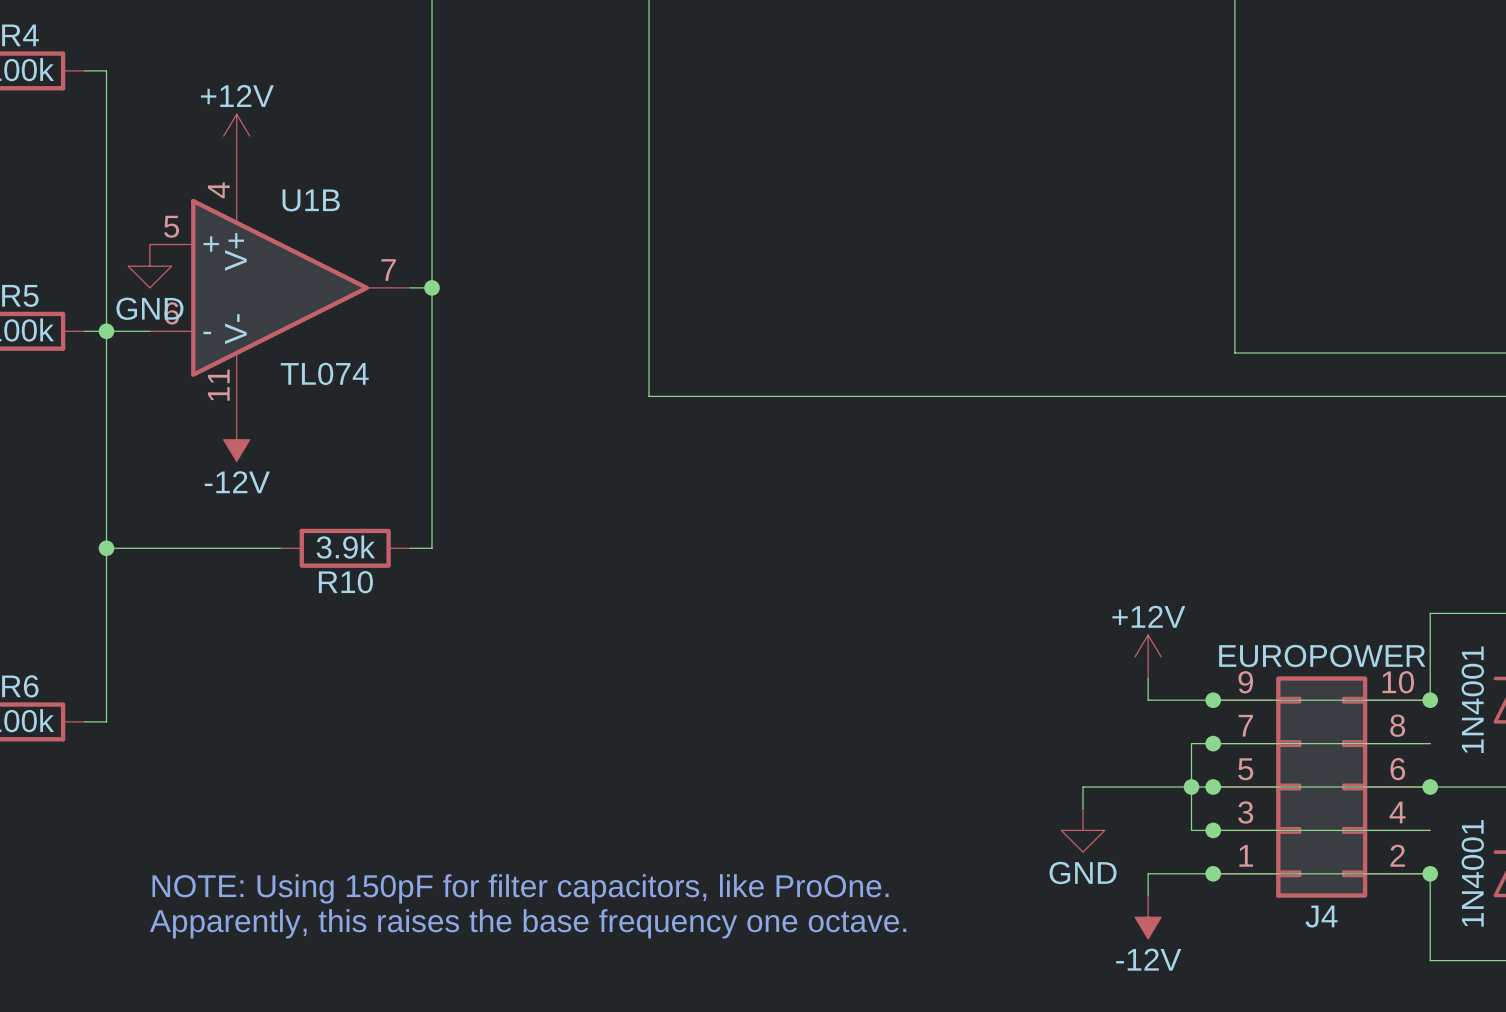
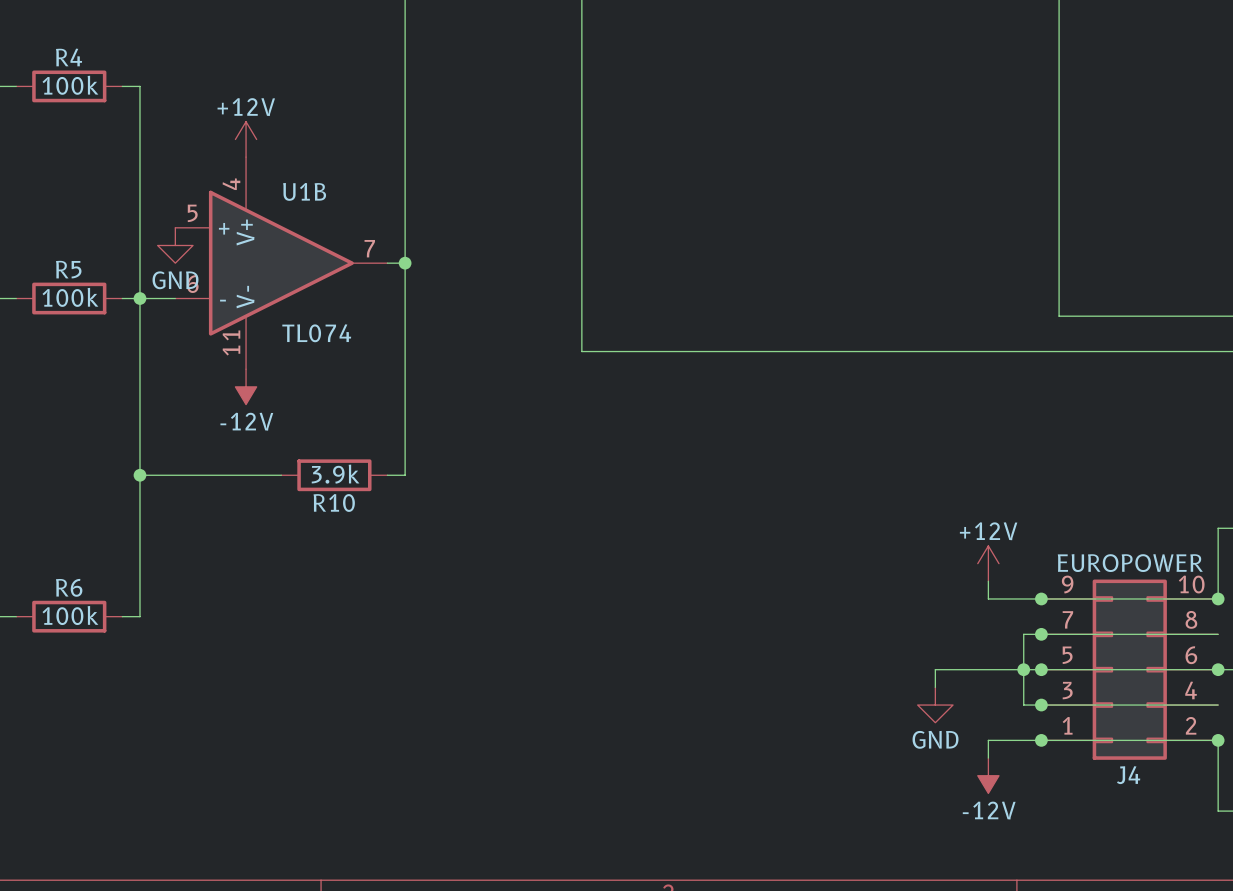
text: NOTE: Using 150pF for filter capacitors, like ProOne. (520, 888) -> none
text: Apparently, this raises the base frequency one octave. (528, 923) -> none

